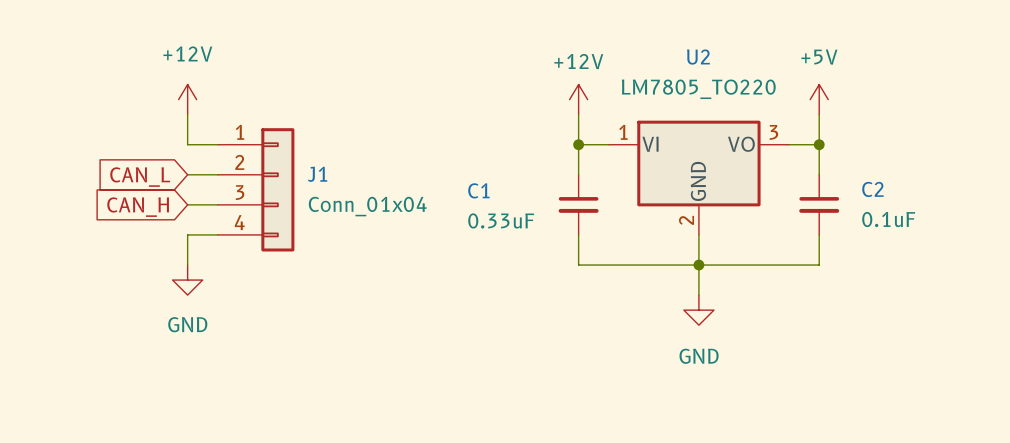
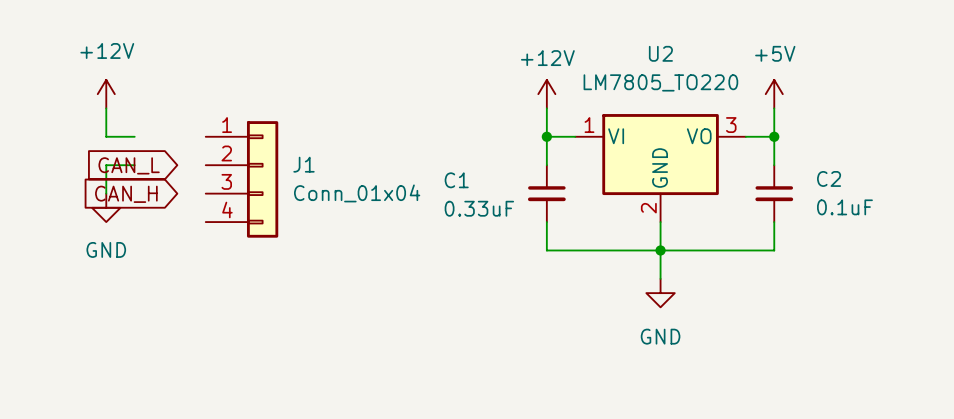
power symbol position: +12V (187, 99) -> +12V (106, 94)
wire: (187, 114) (187, 144) (217, 144) -> (106, 108) (106, 136) (134, 136)
wire: (187, 174) (217, 174) -> none
wire: (187, 204) (217, 204) -> none
wire: (217, 234) (187, 234) (187, 265) -> (134, 165) (106, 165) (106, 193)
power symbol position: GND (187, 280) -> GND (106, 207)

